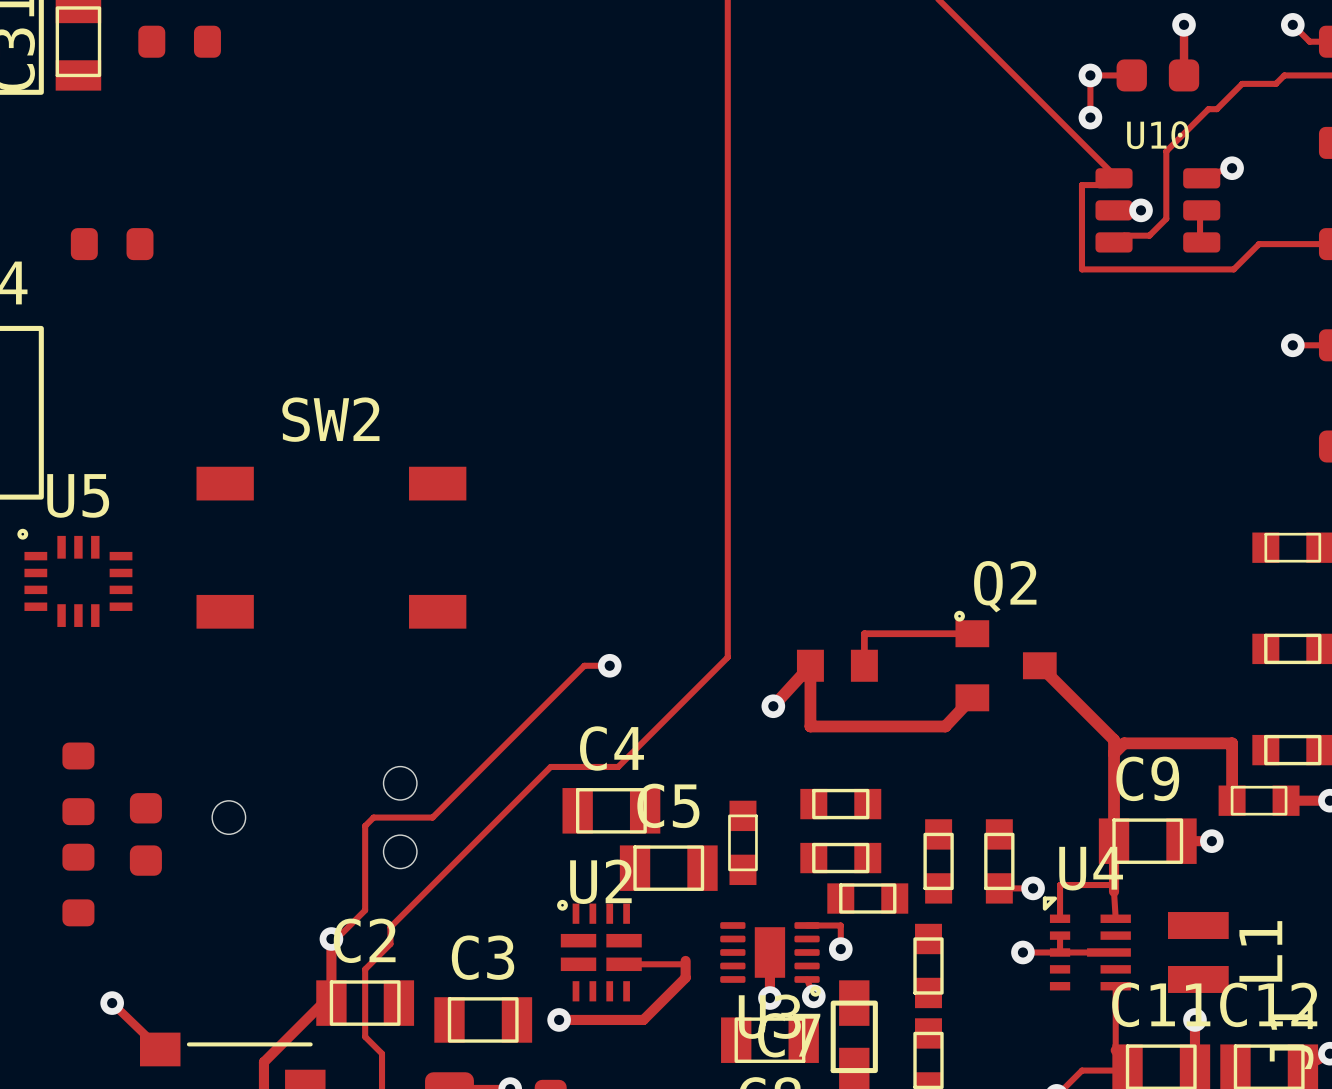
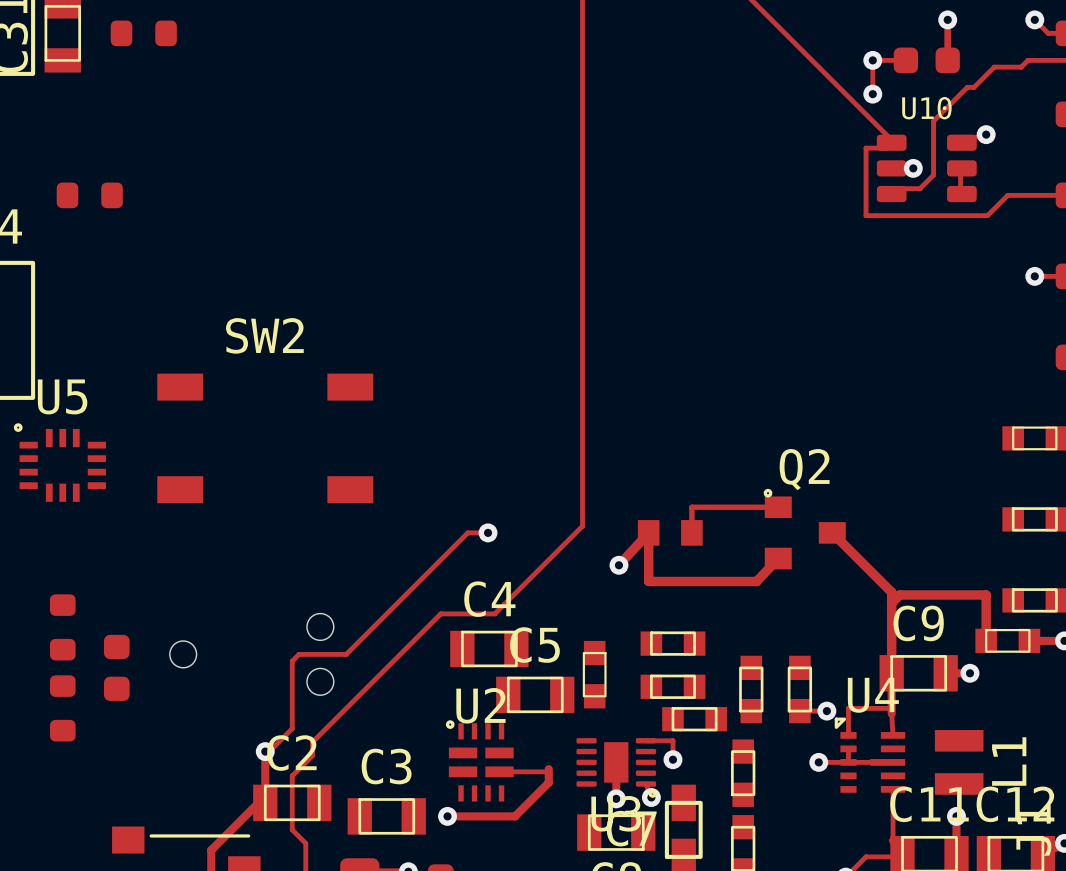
track: (112, 1003) (160, 1049) -> none
via: (112, 1003) -> none

